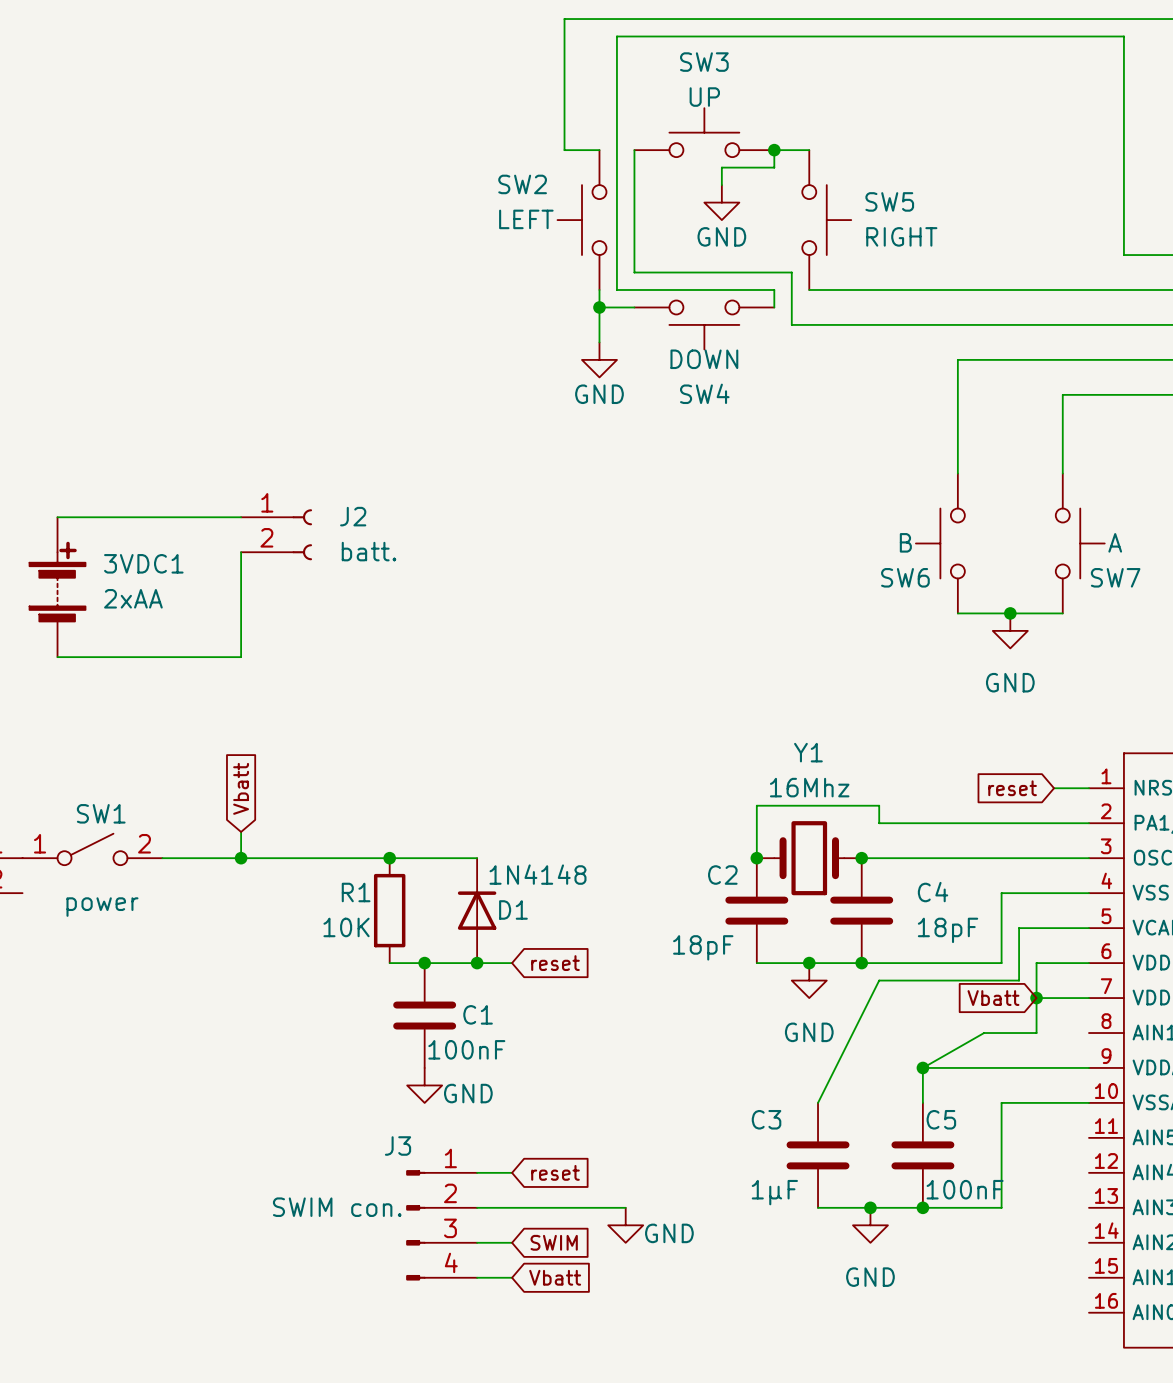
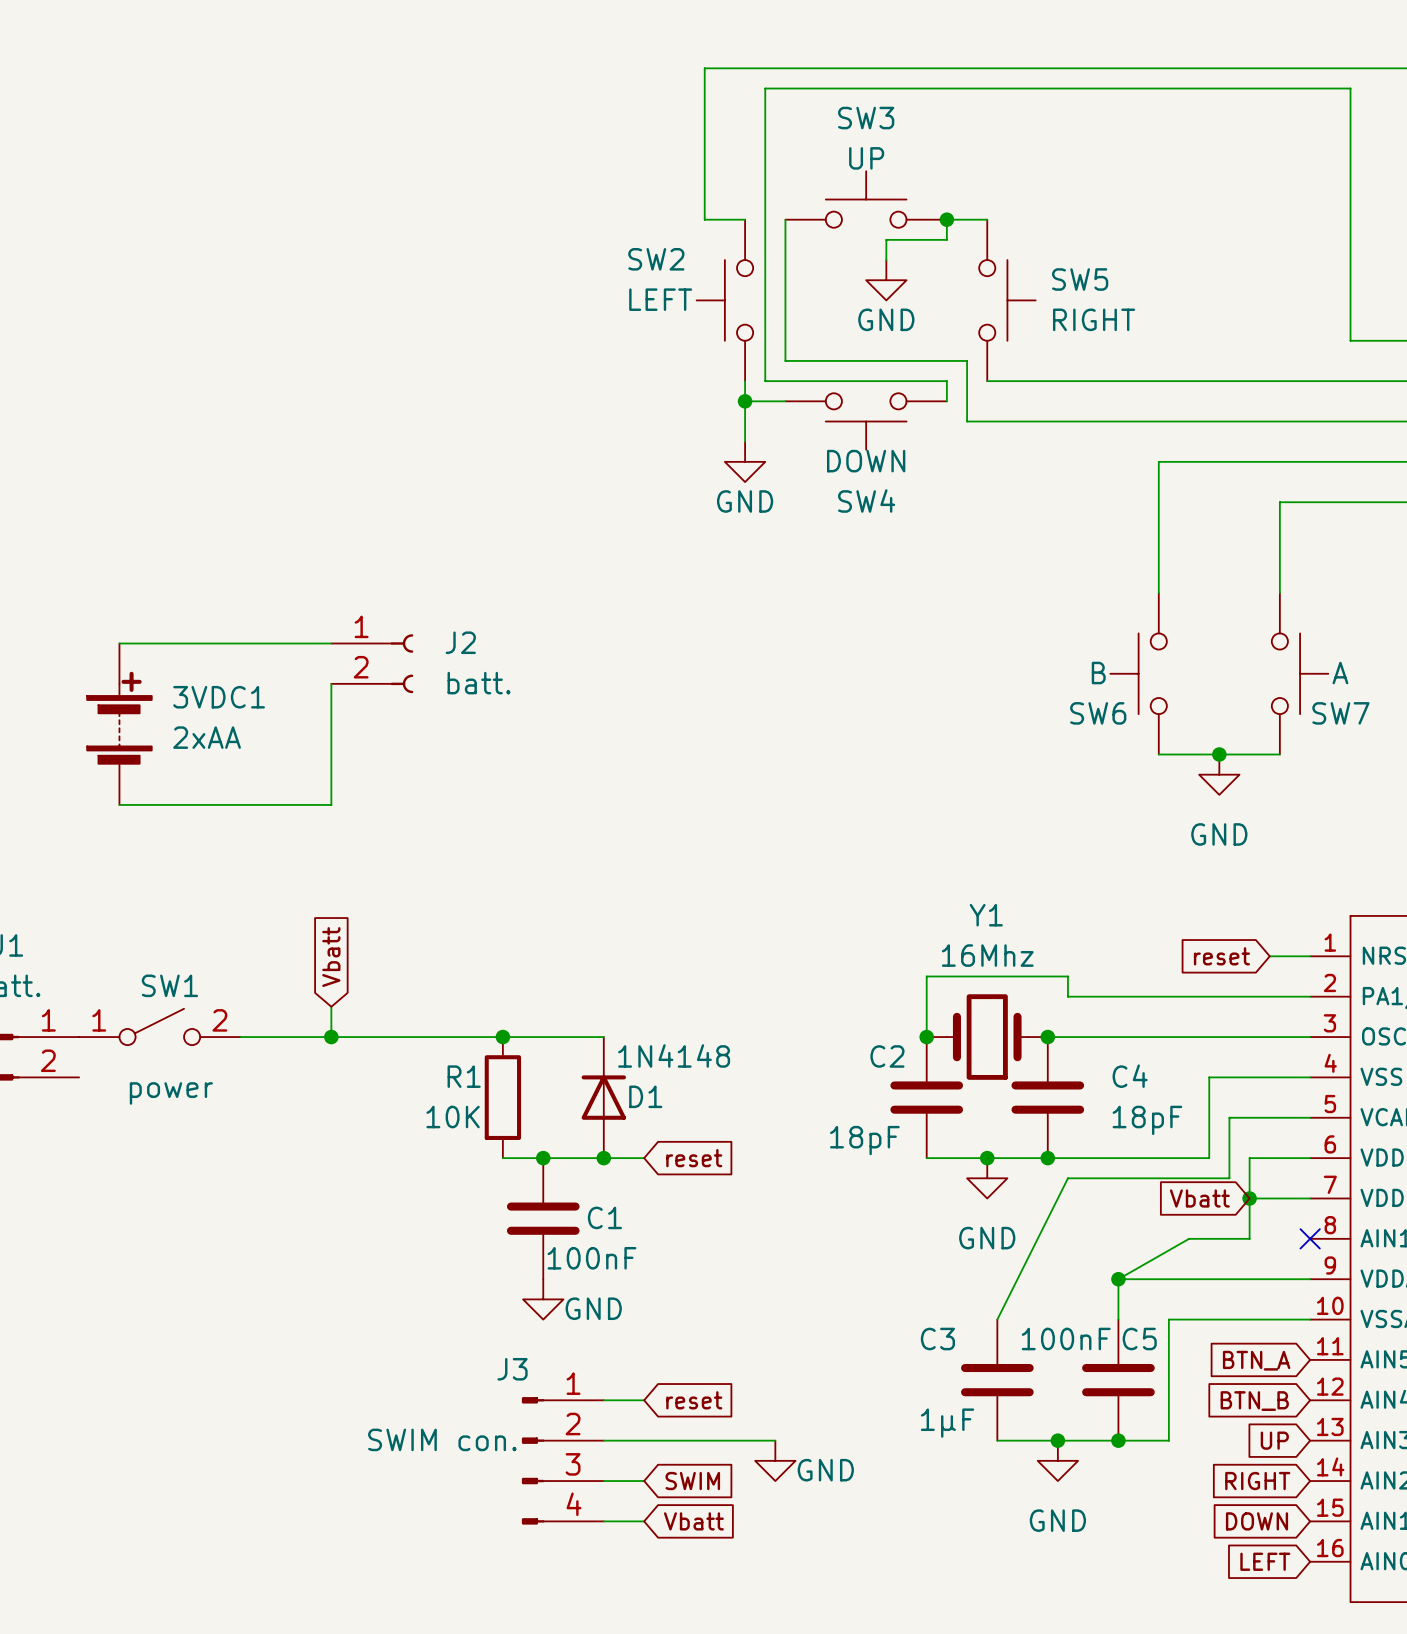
no-connect mark: none -> (1310, 1238)
wire: (1001, 1102) (1001, 1207) (966, 1207) -> (1209, 1319) (1168, 1319) (1168, 1440)
global label: none -> BTN_A (1256, 1360)
global label: none -> BTN_B (1254, 1401)
C5 value position: 100nF (965, 1189) -> 100nF (1066, 1339)
global label: none -> UP (1274, 1440)
global label: none -> RIGHT (1257, 1481)
global label: none -> DOWN (1257, 1521)
global label: none -> LEFT (1265, 1561)

